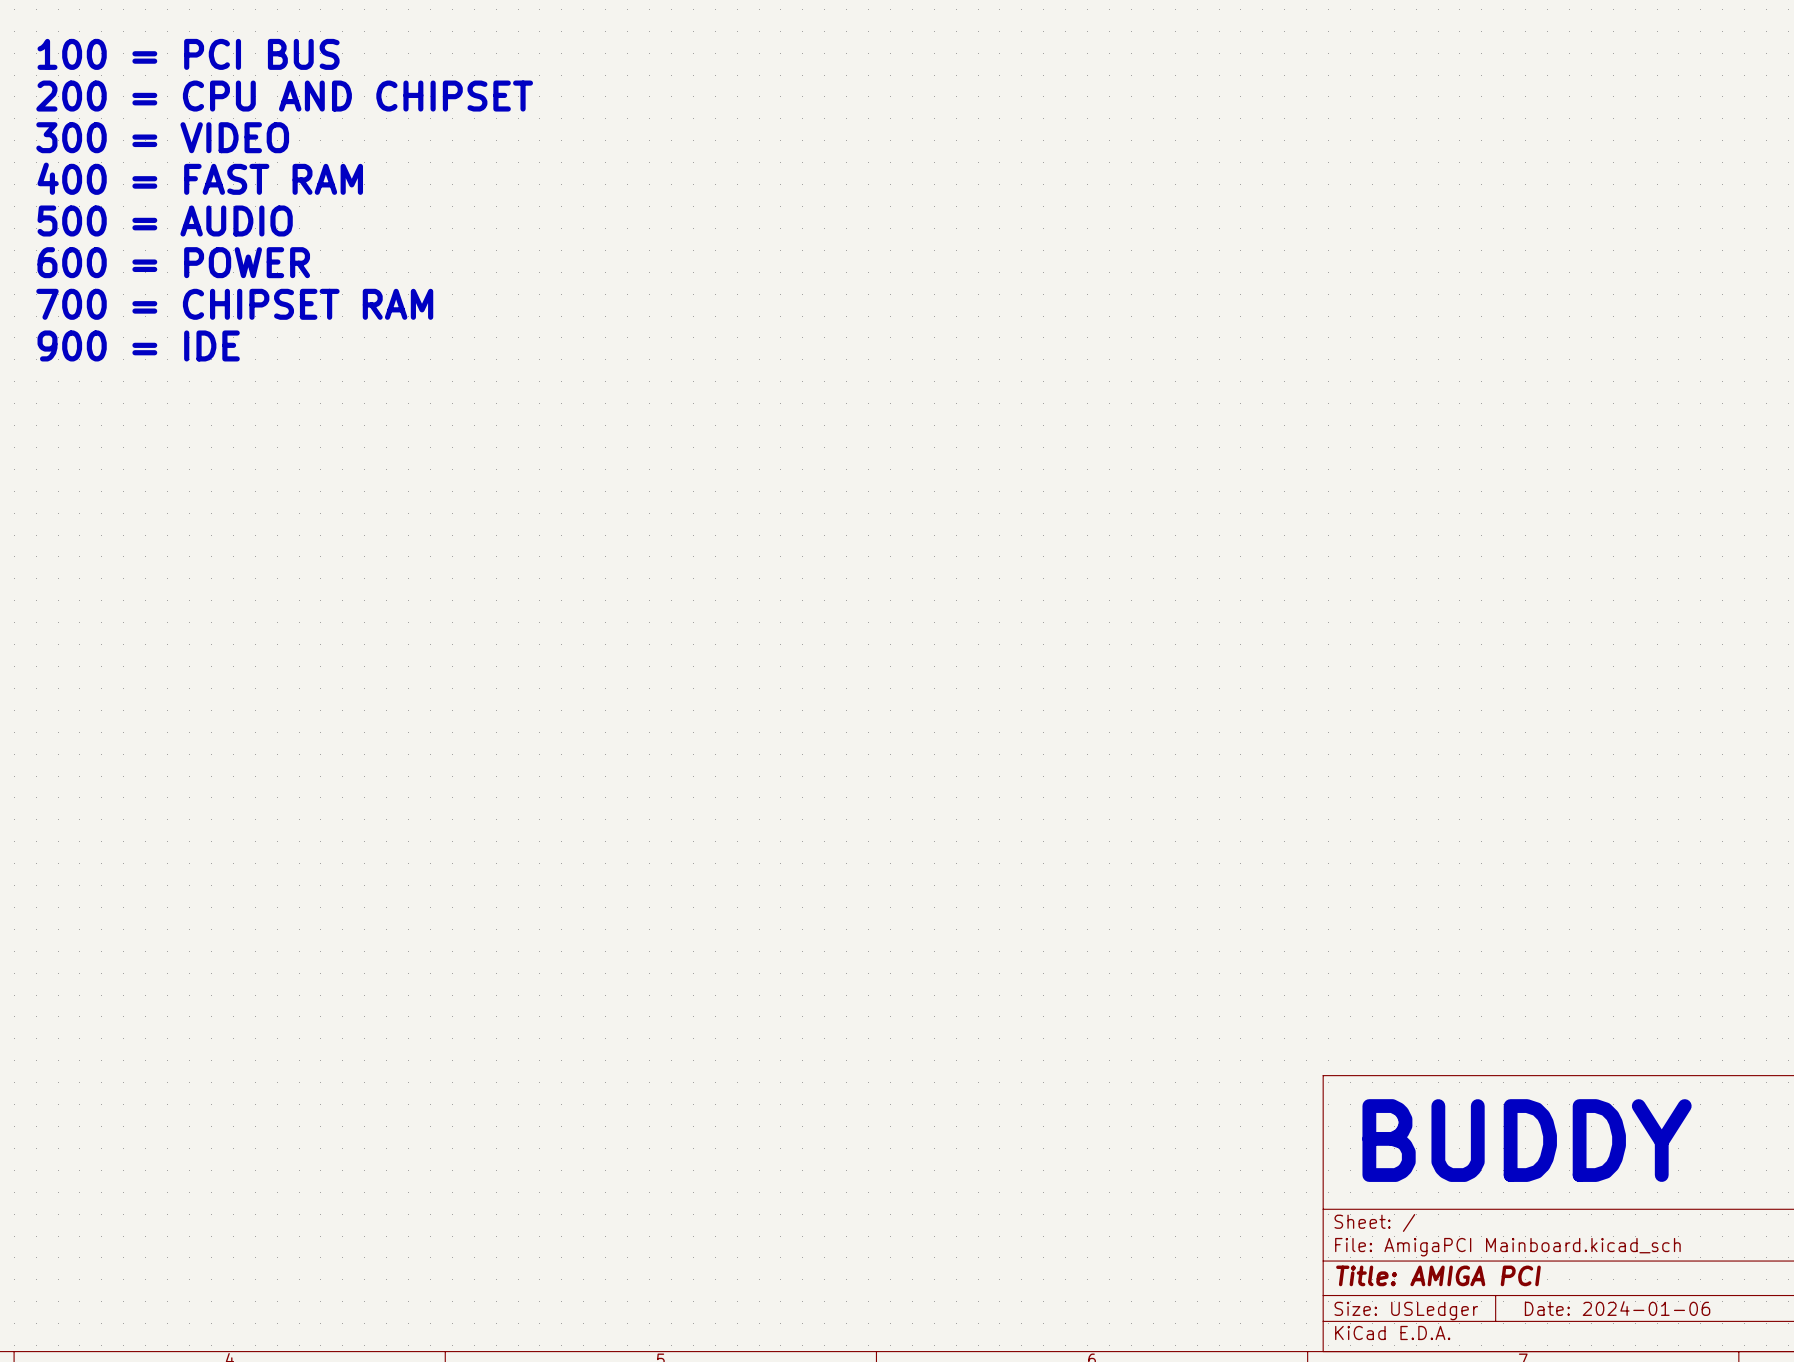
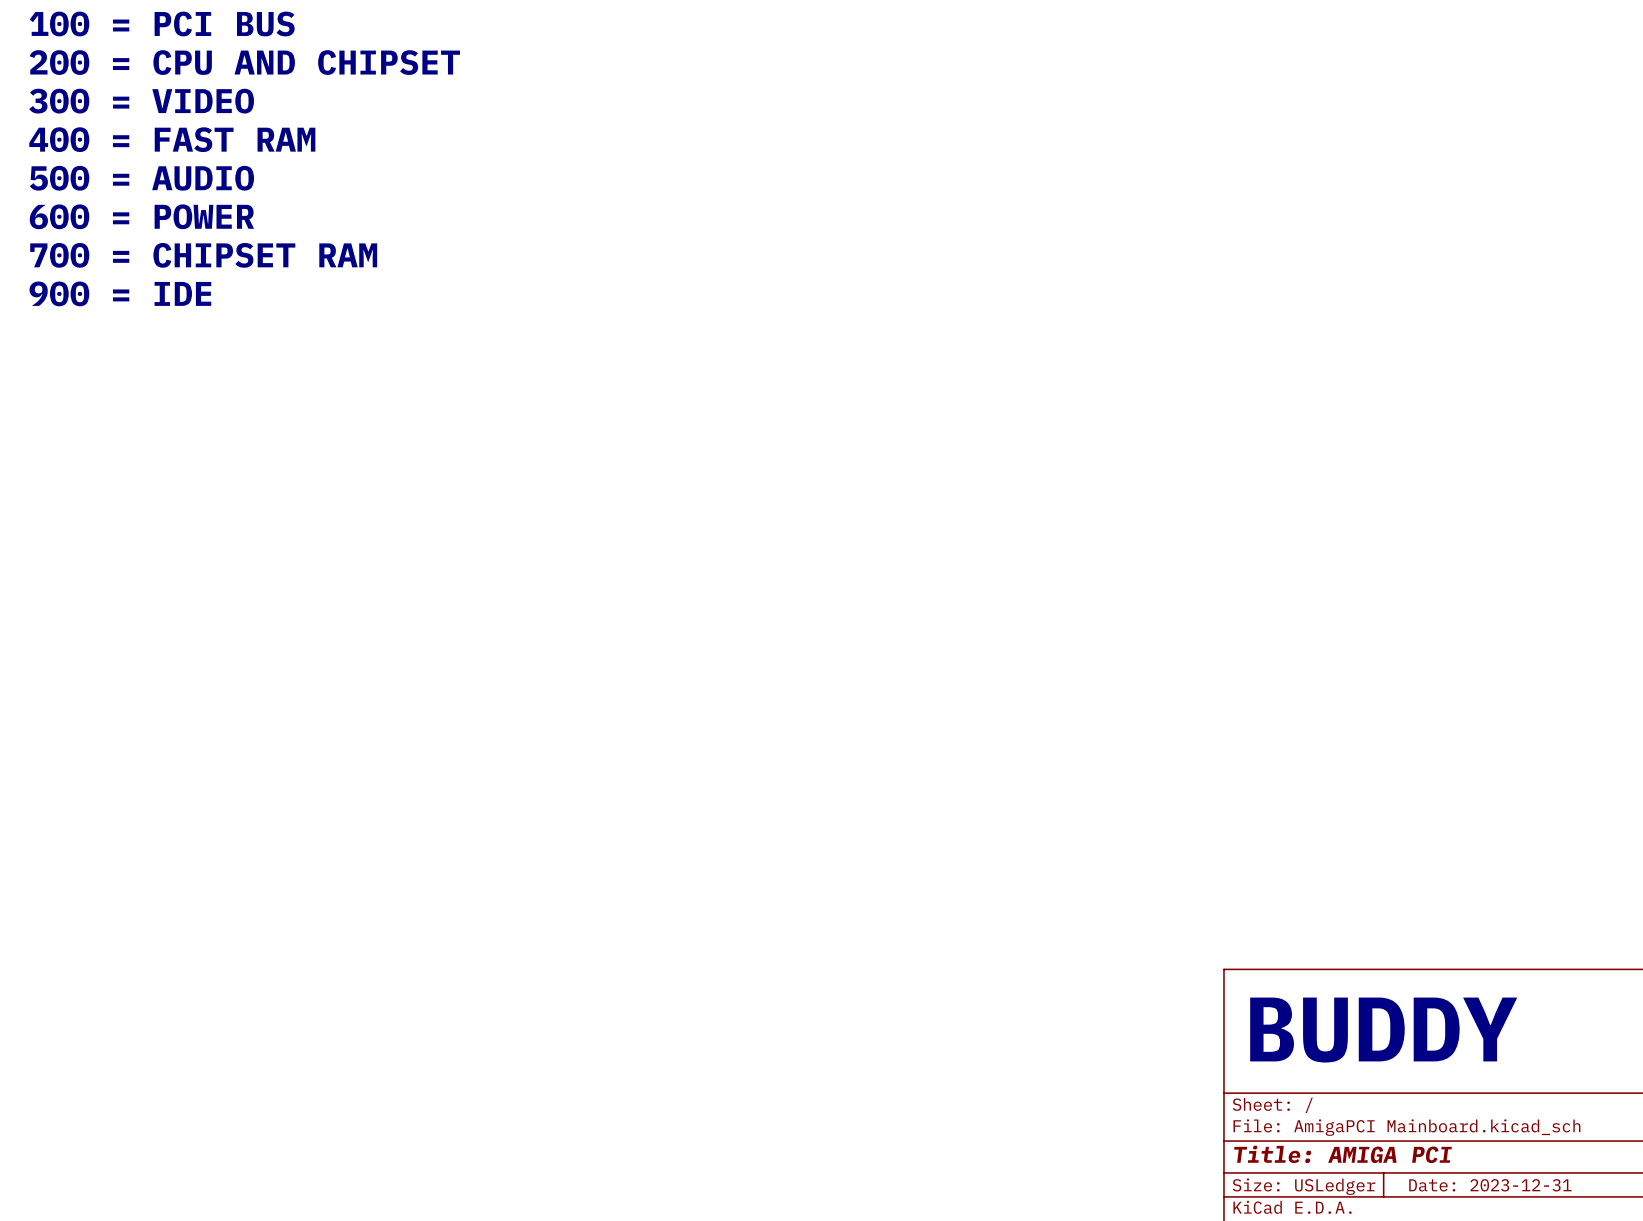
title block: Date: 2024-01-06 (1617, 1308) -> Date: 2023-12-31 (1490, 1185)

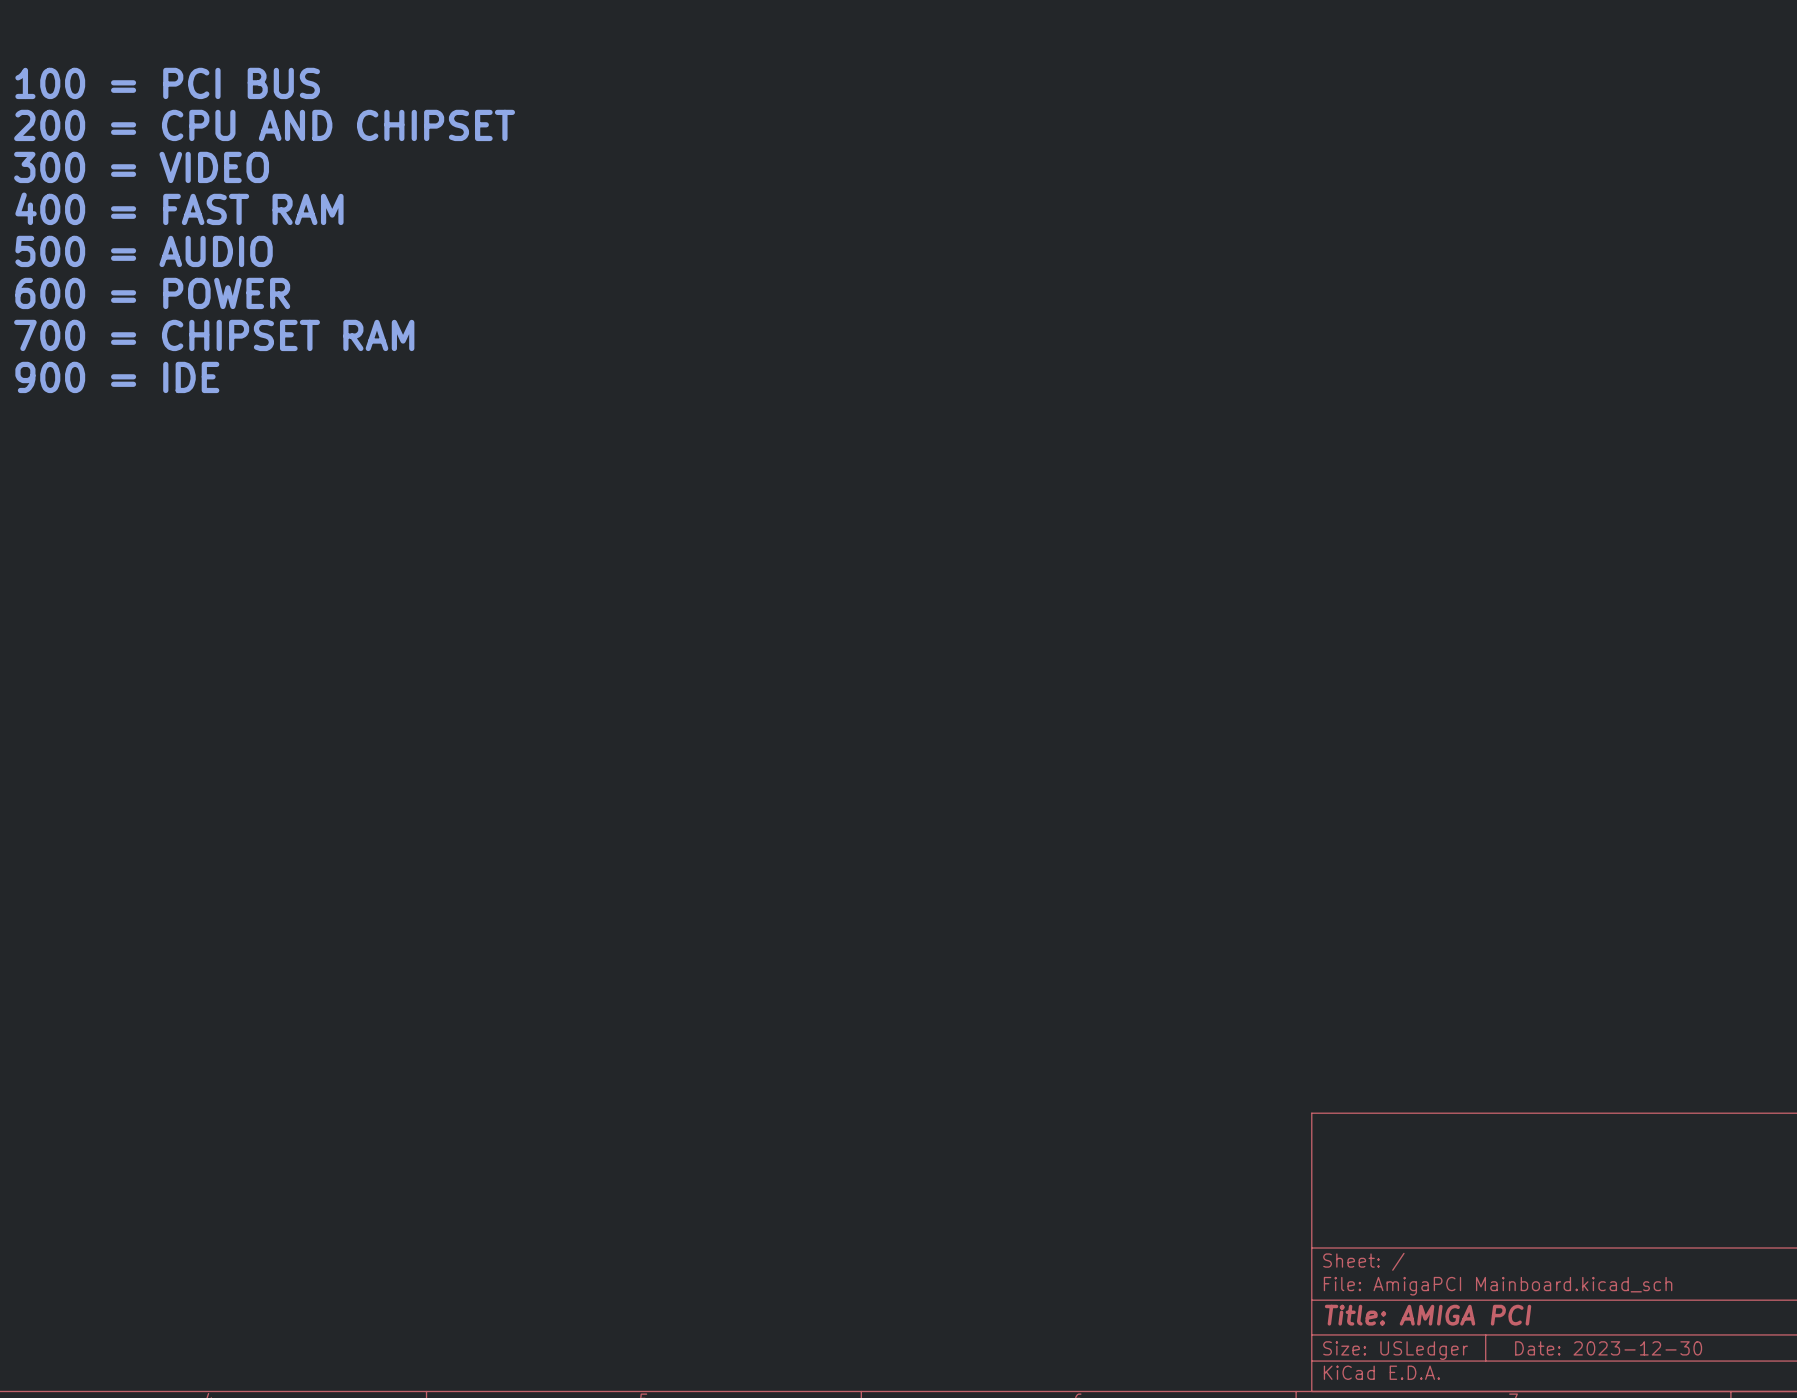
text: BUDDY (1383, 1030) -> none
title block: Date: 2023-12-31 (1490, 1185) -> Date: 2023-12-30 (1608, 1348)

